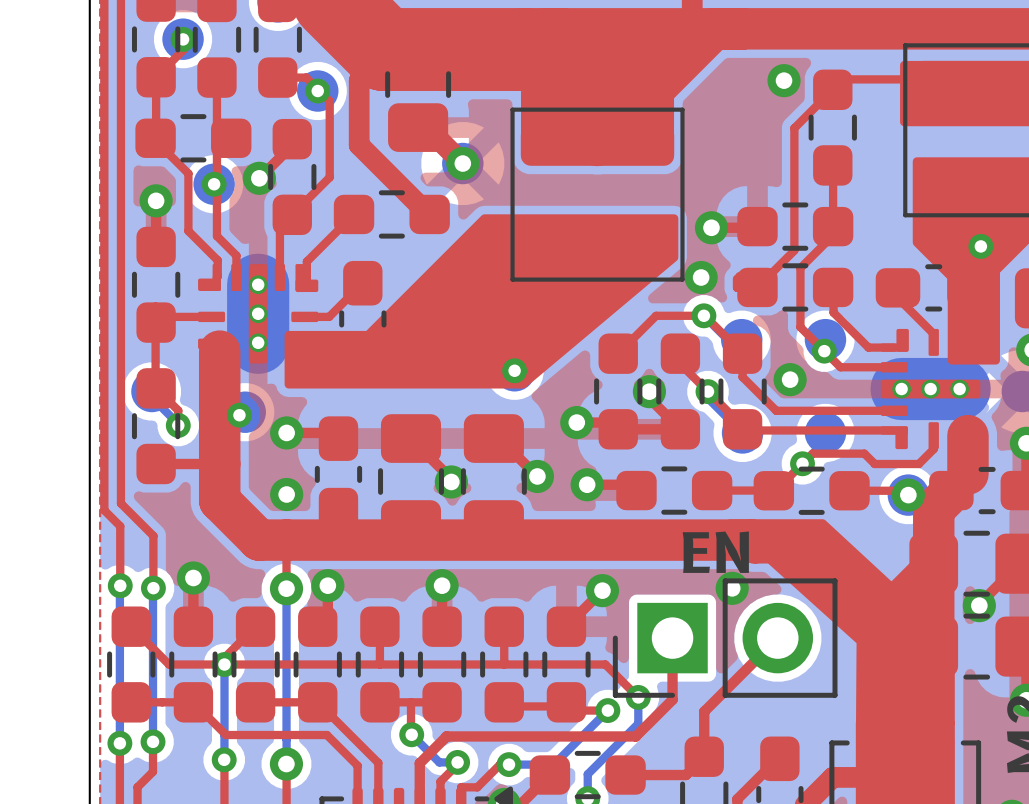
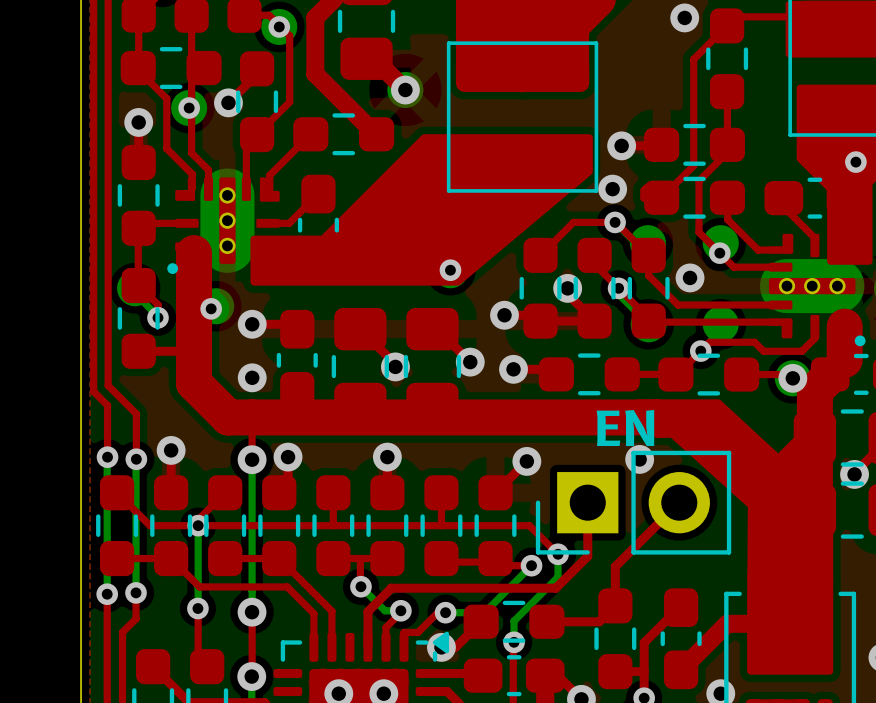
part footprint: [198, 264, 319, 364] -> [167, 177, 280, 275]
part footprint: [880, 328, 981, 450] -> [768, 233, 866, 347]

